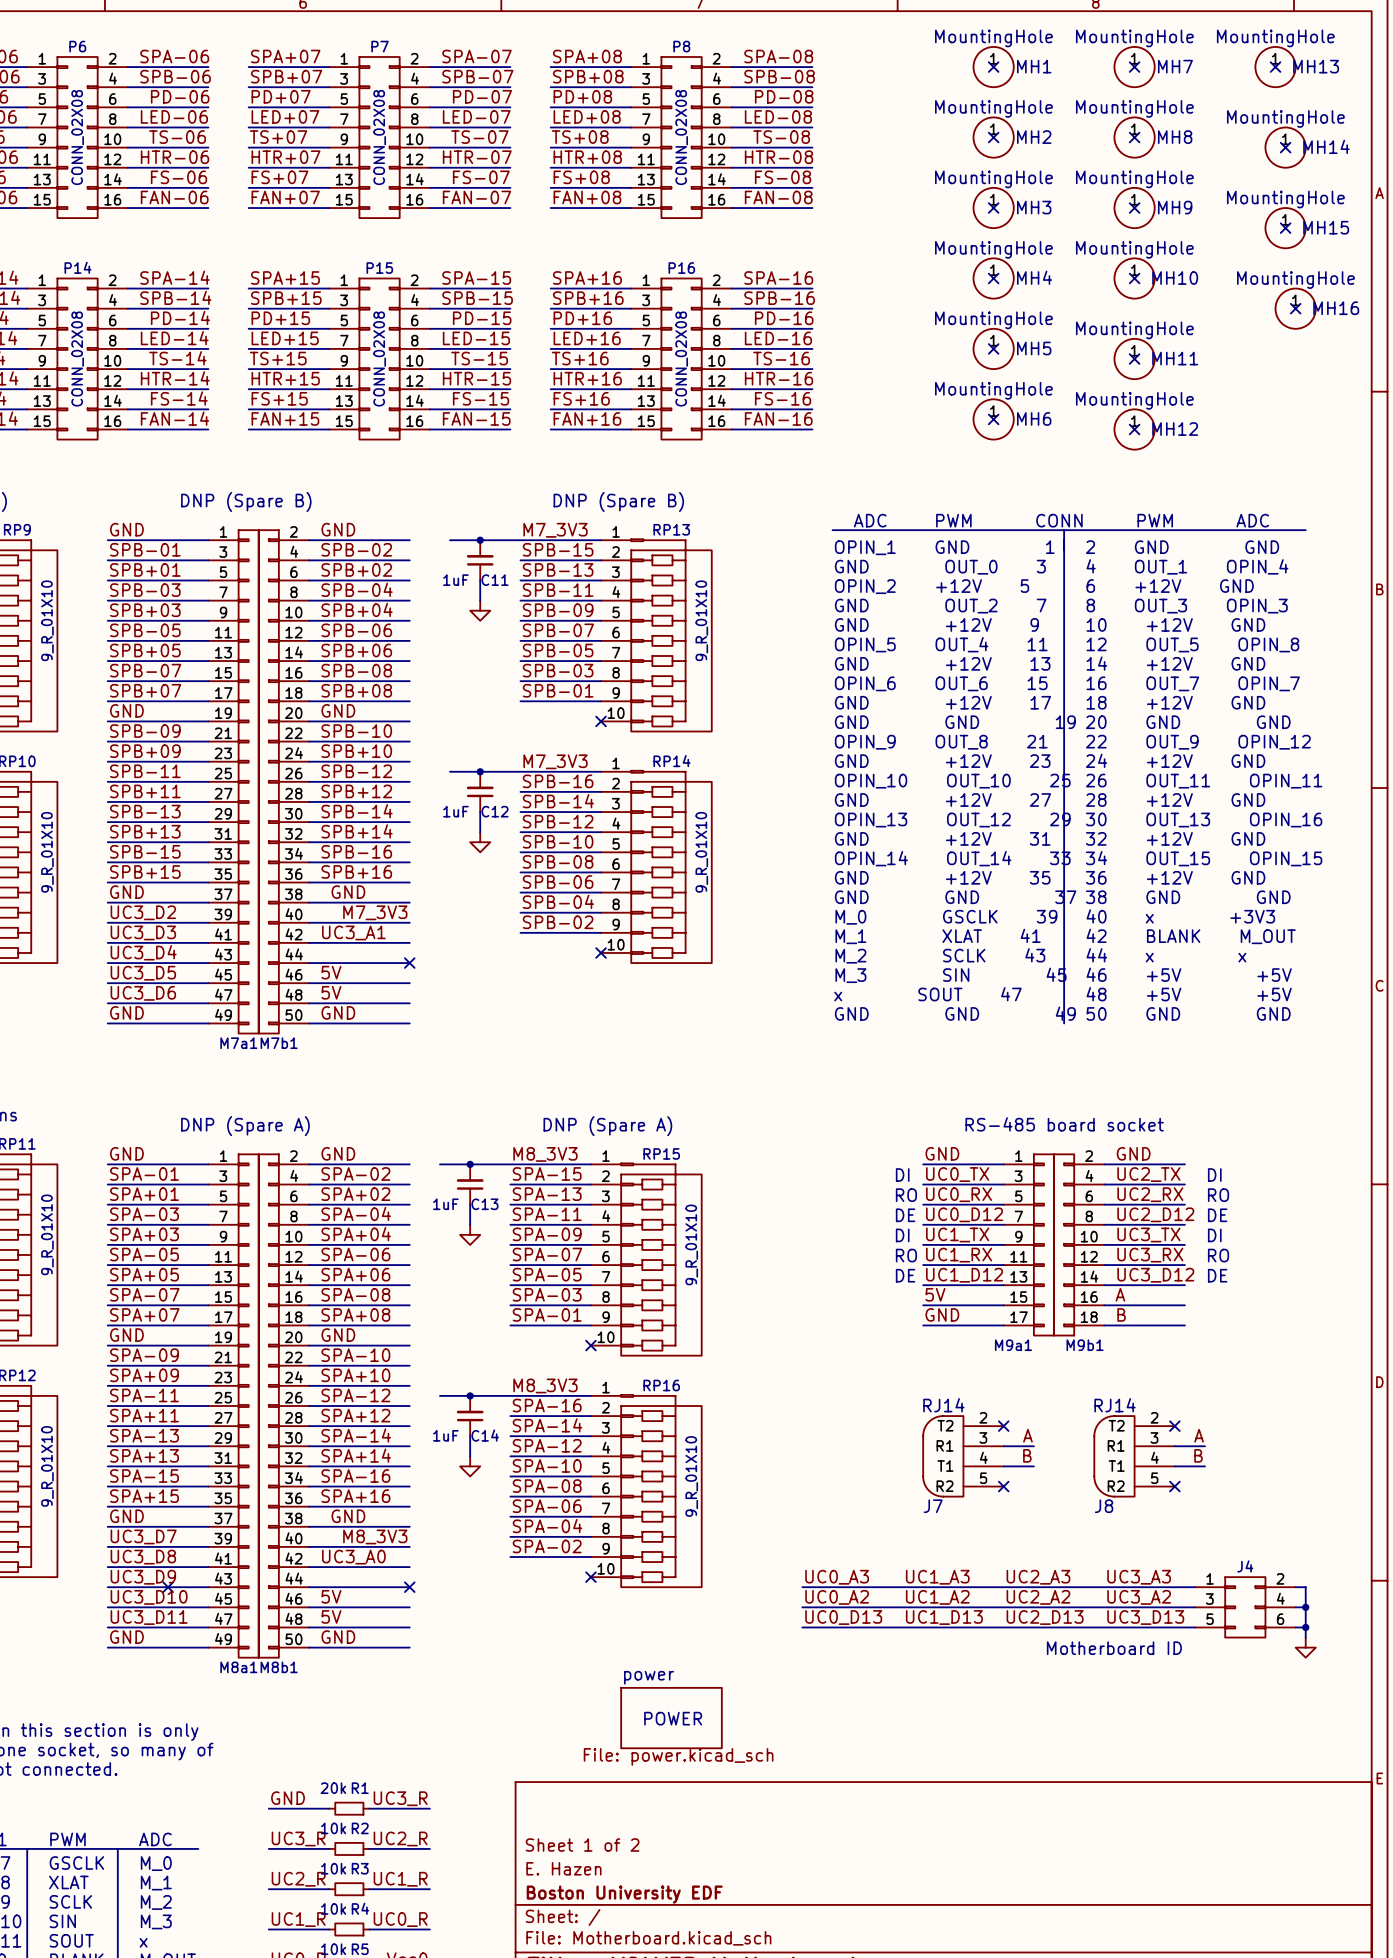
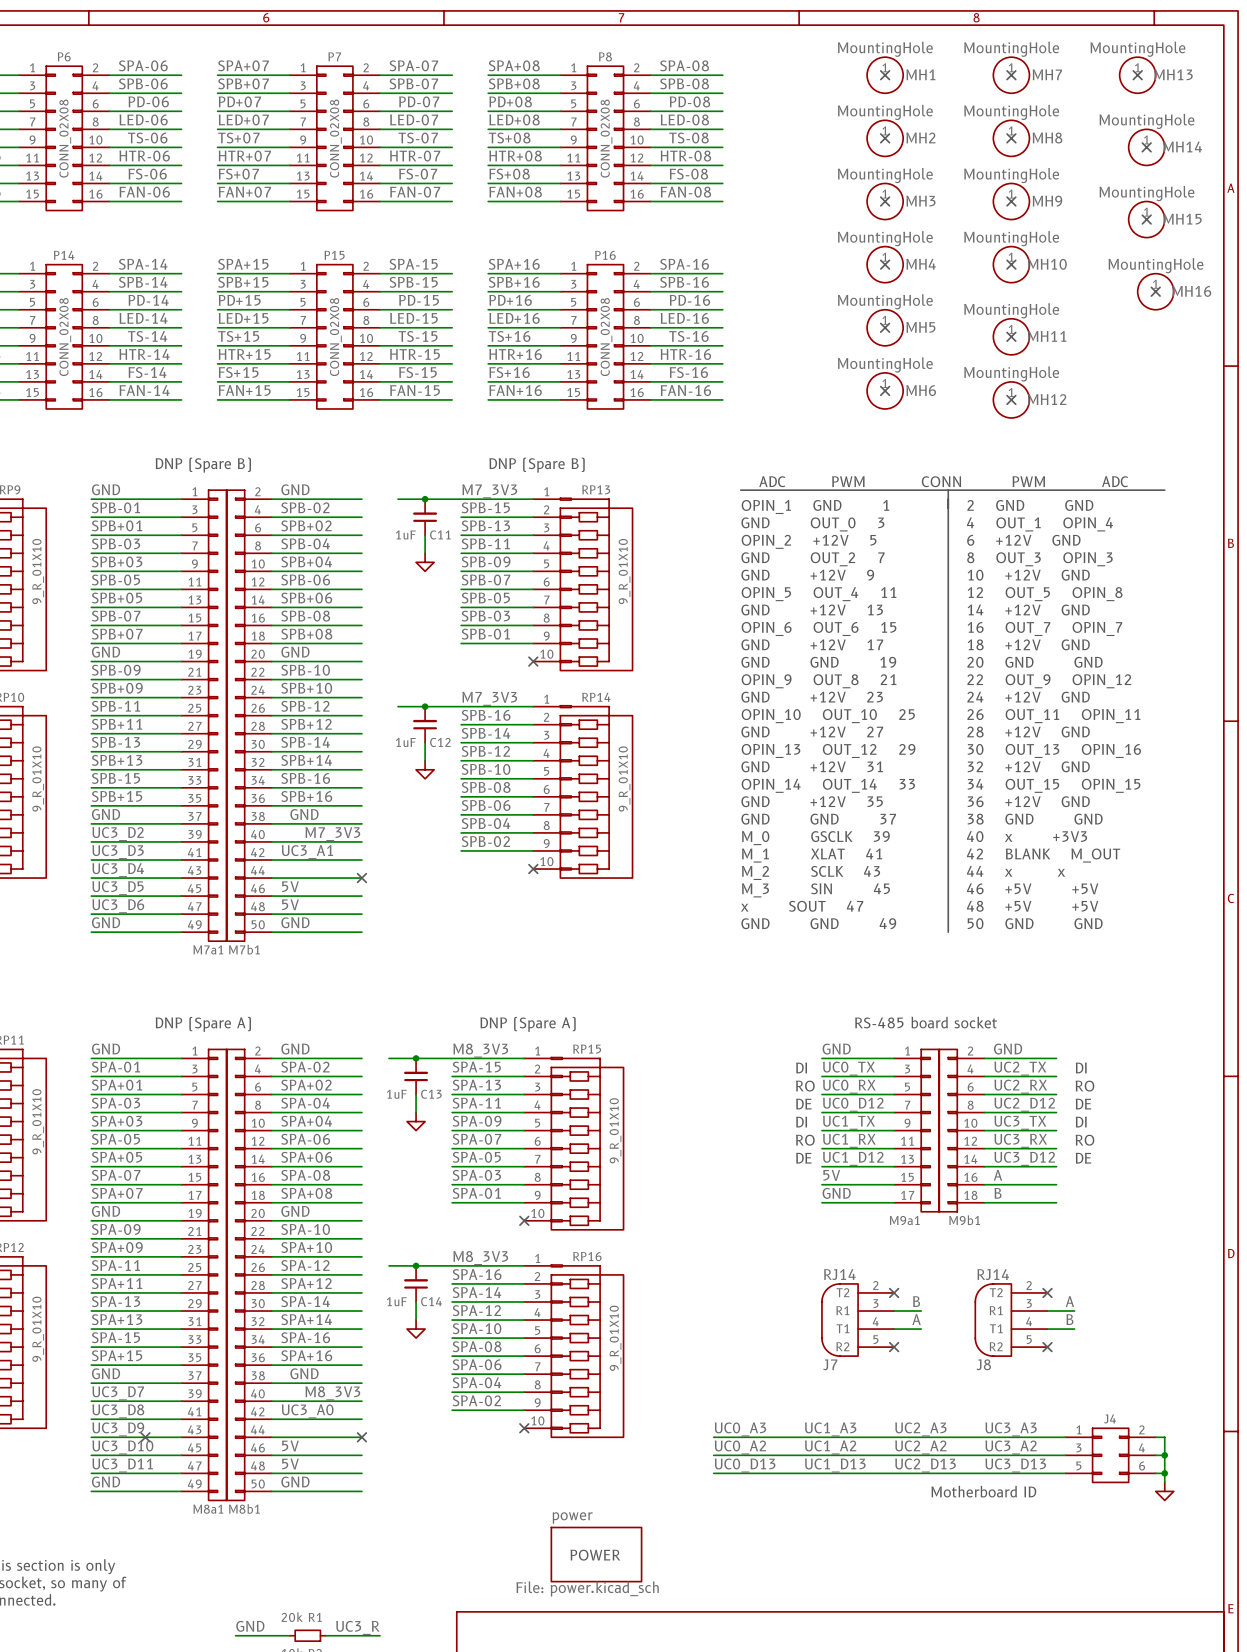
label: A (1027, 1435) -> B (916, 1301)
label: B (1027, 1455) -> A (916, 1319)

